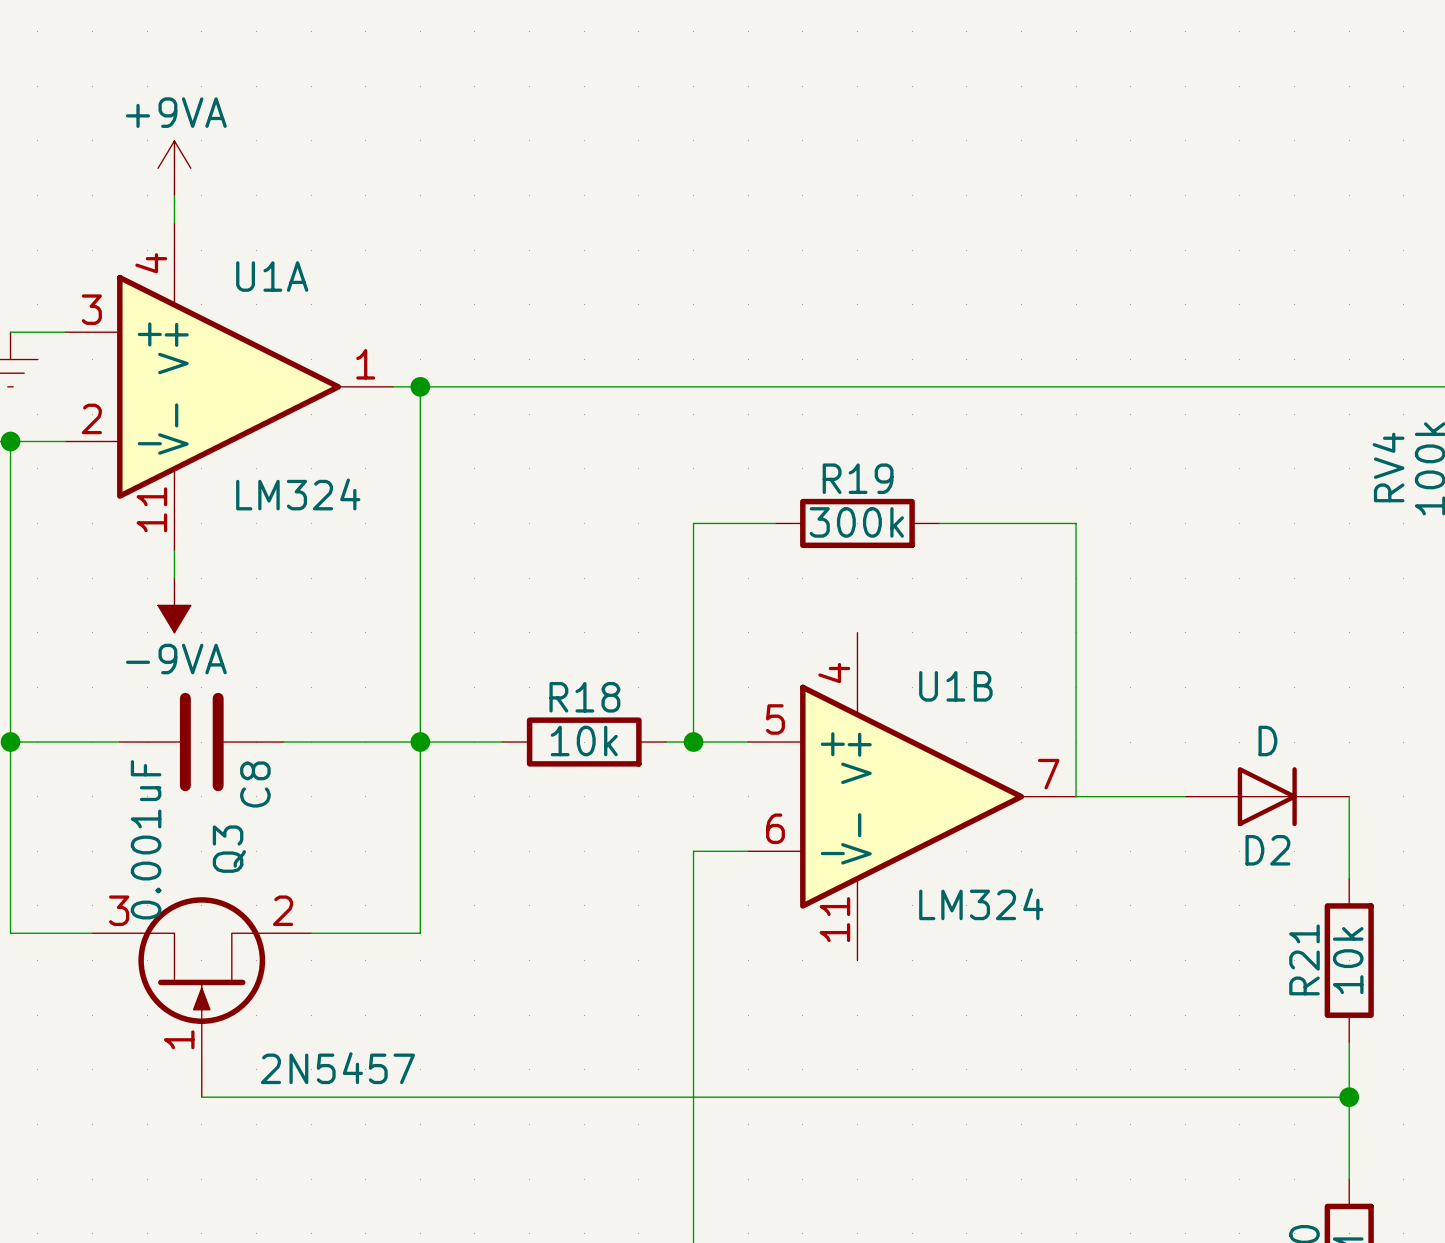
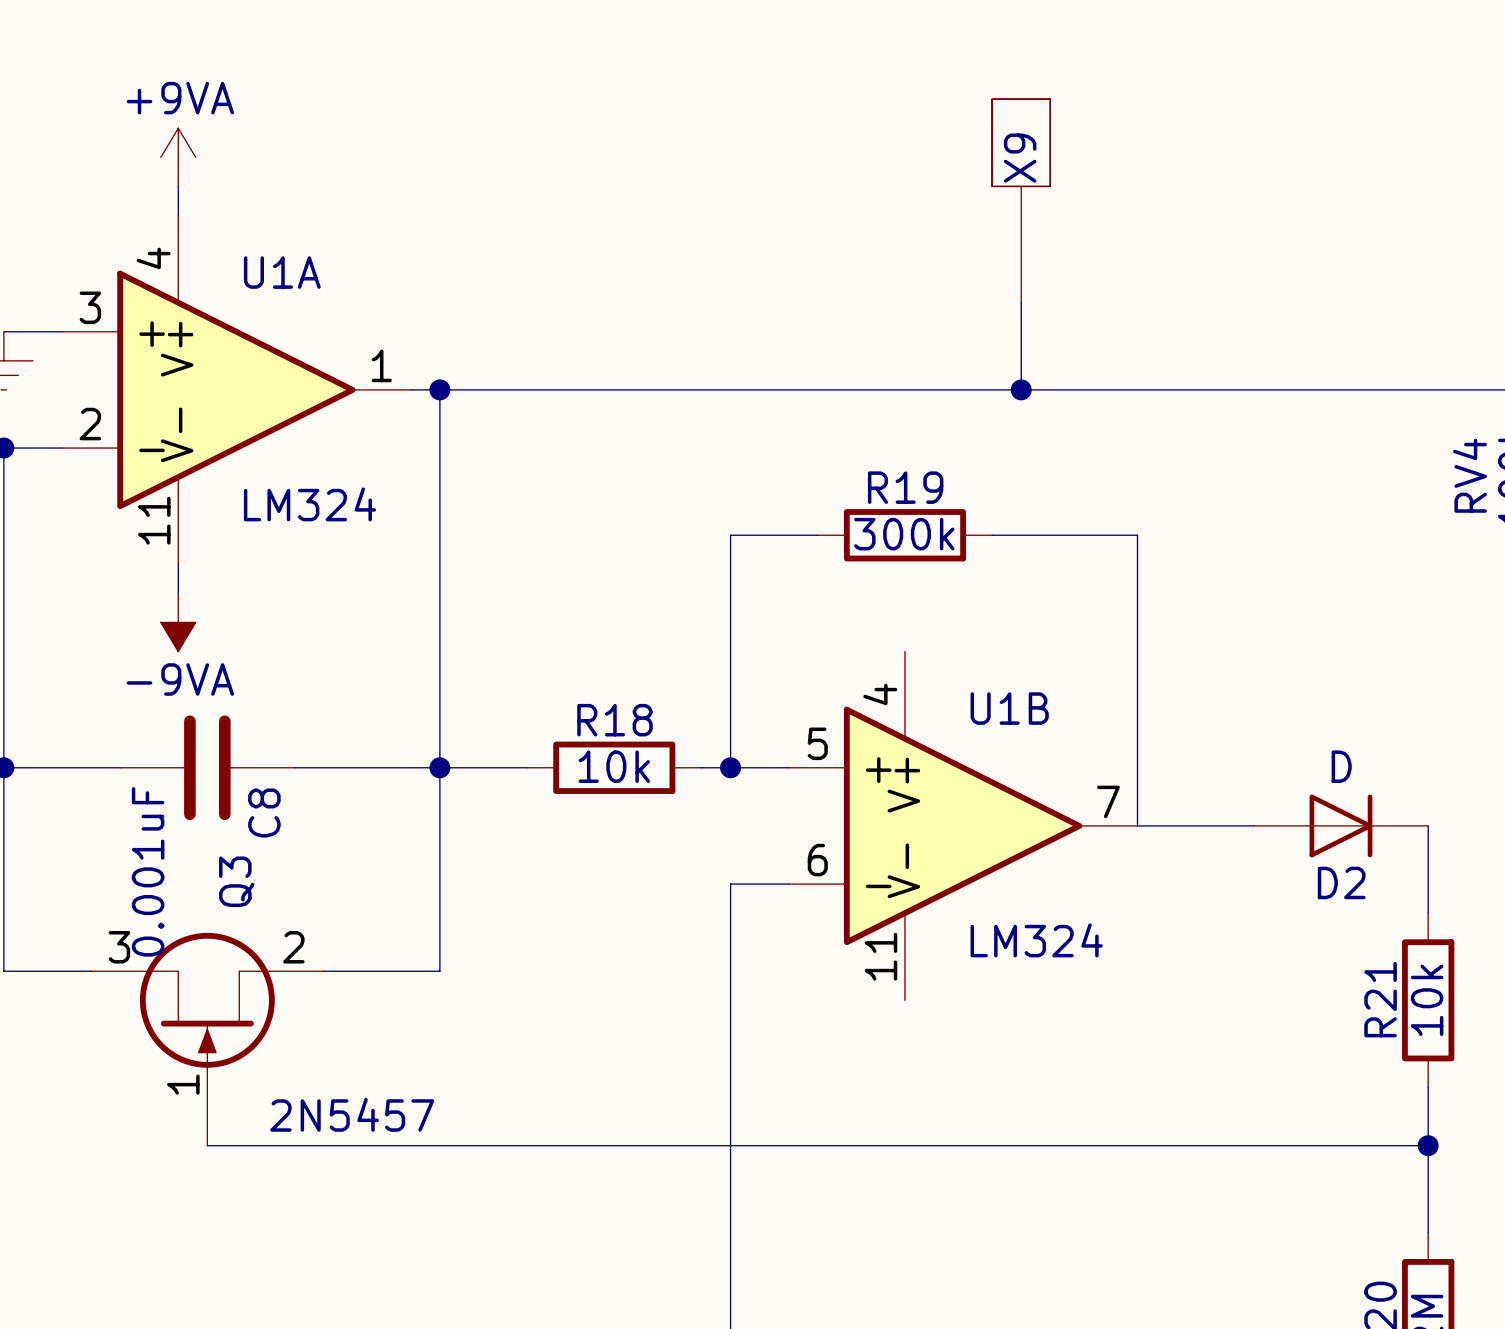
X9: none -> (1021, 200)
wire: none -> (1021, 302) (1021, 389)
junction: none -> (1021, 389)

